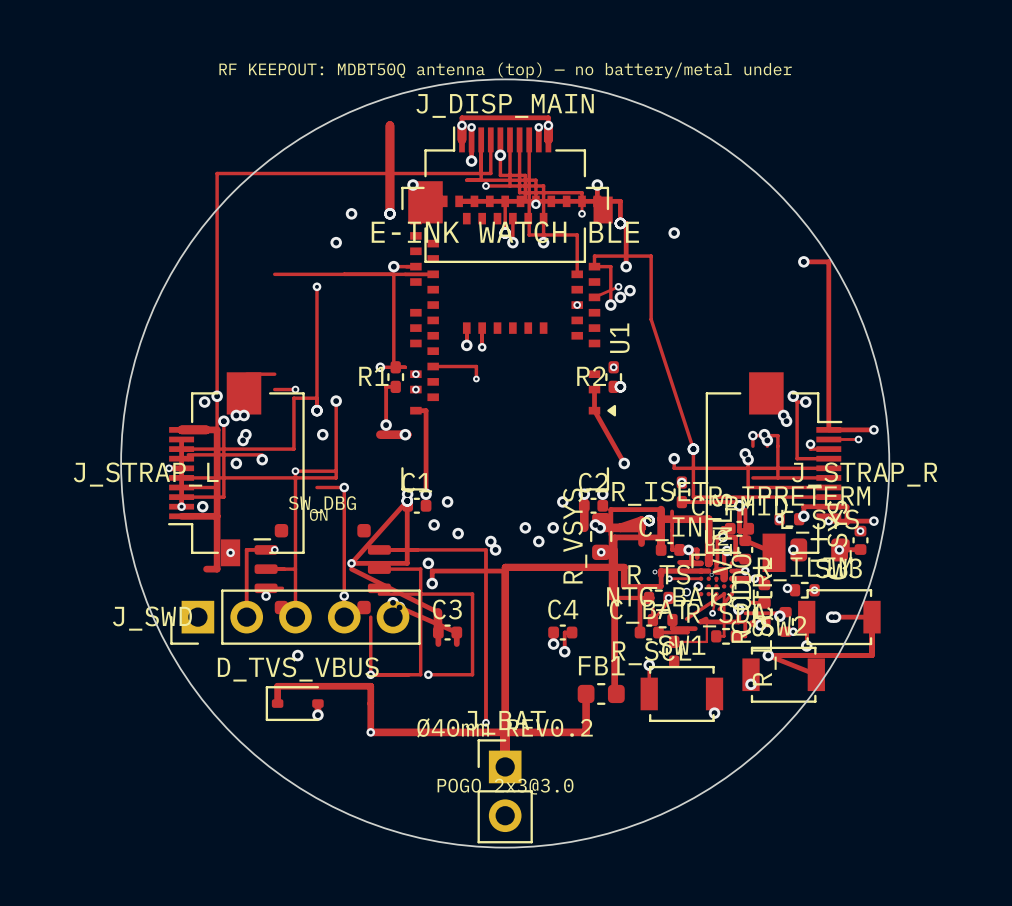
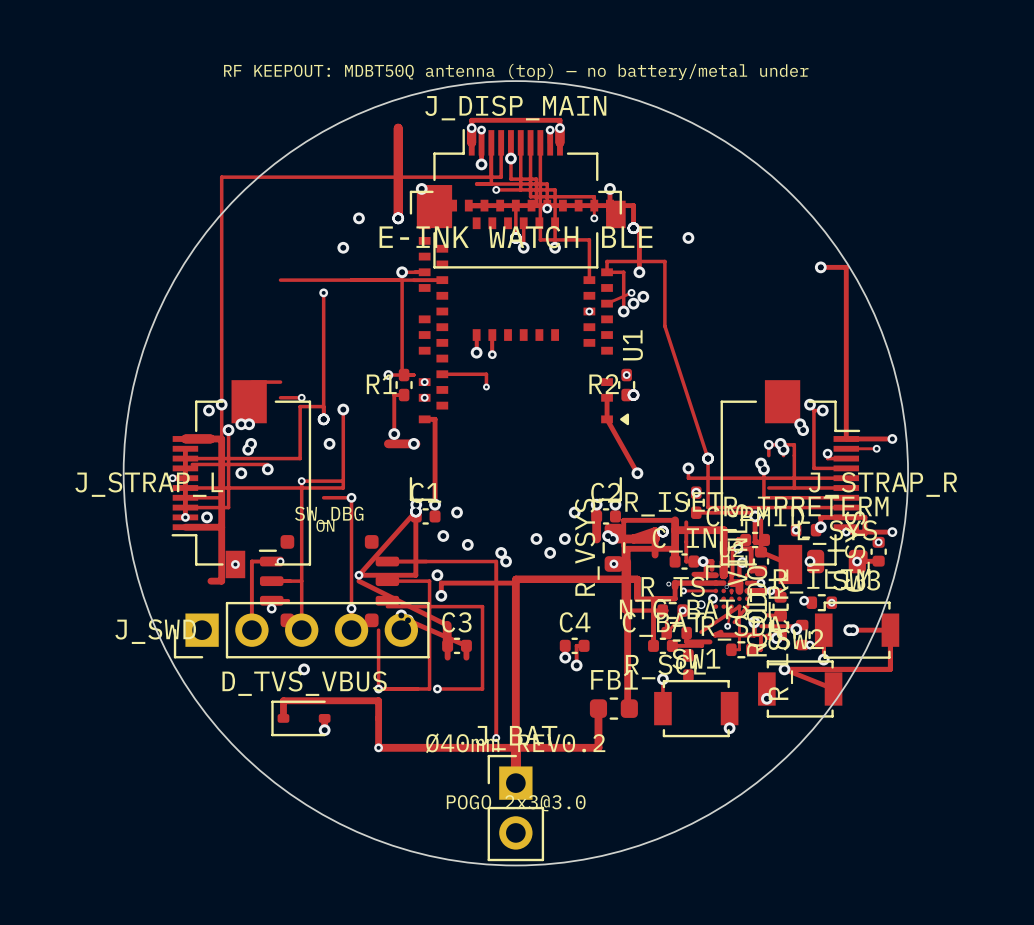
track: (700, 621) (706, 621) (706, 641) (674, 641) -> none

